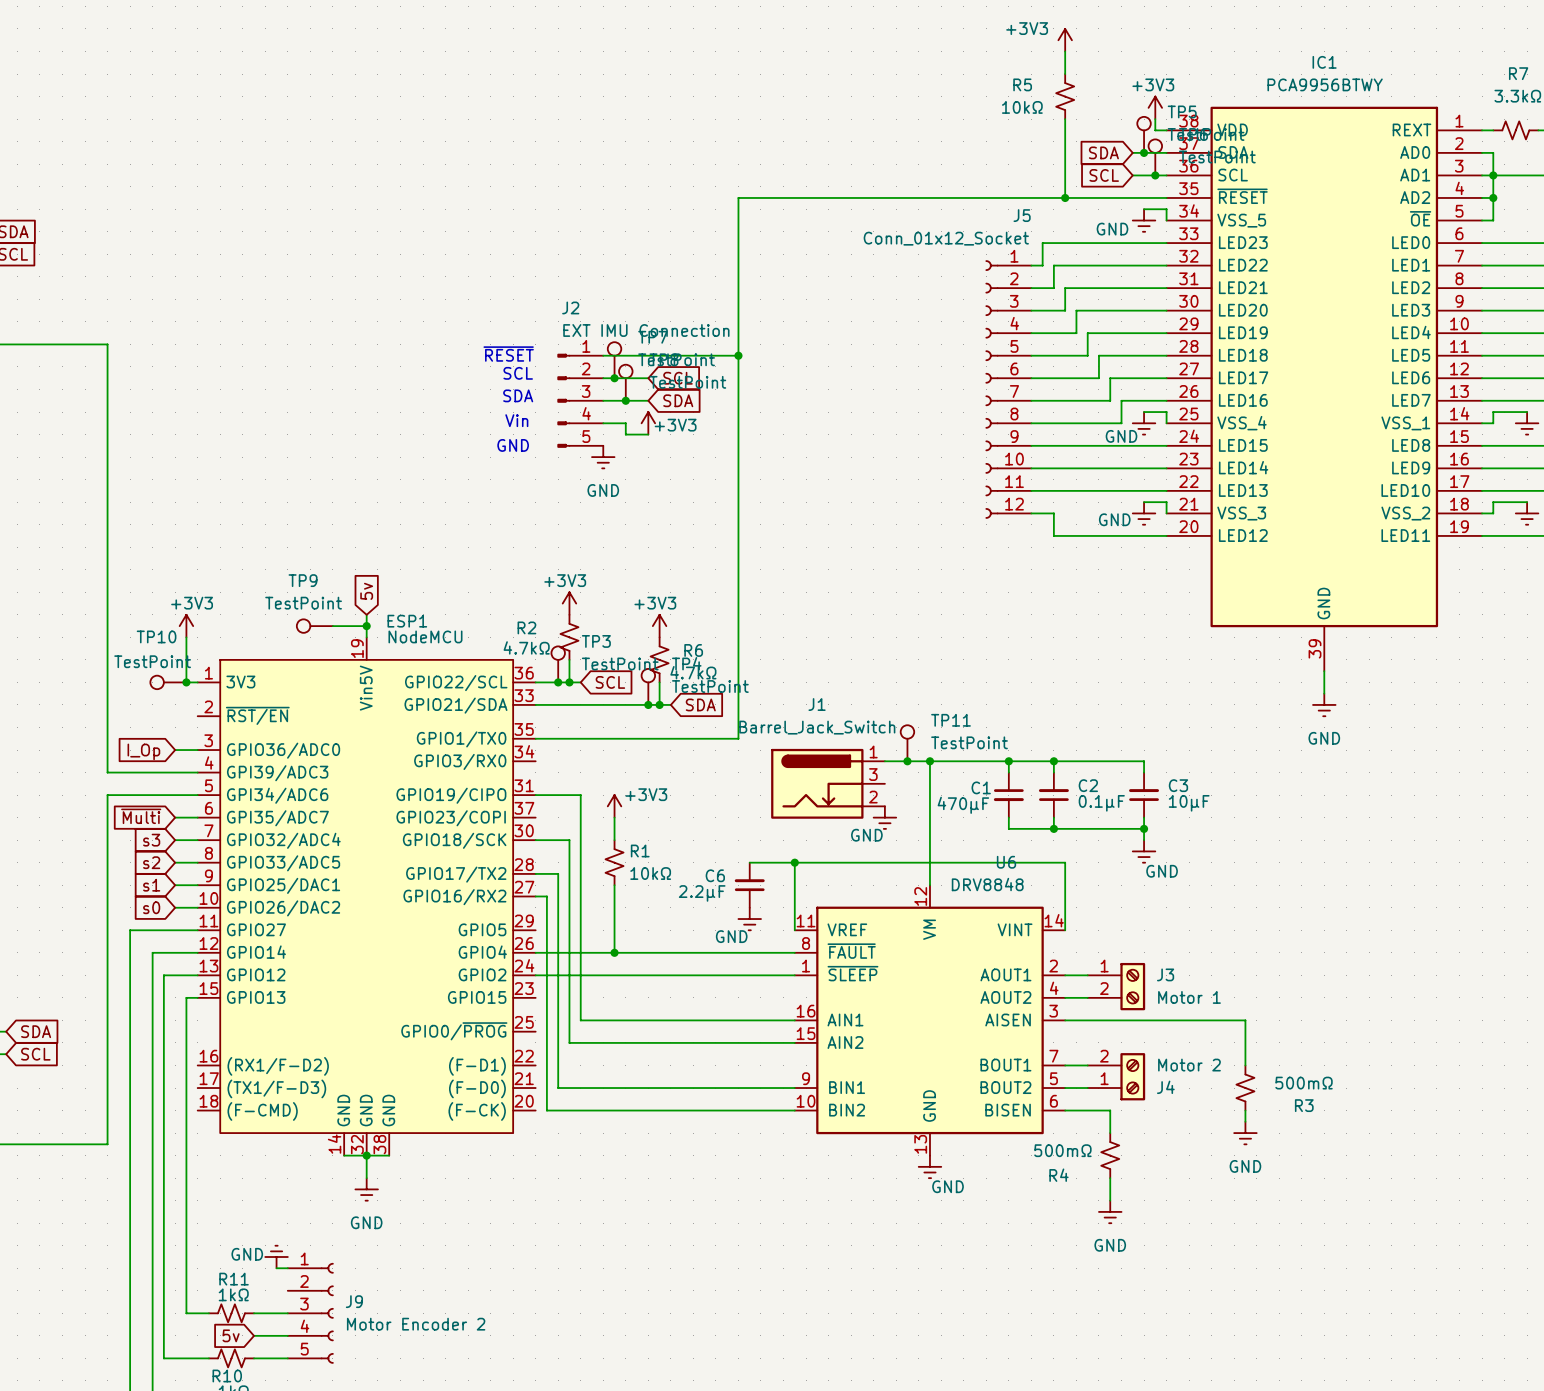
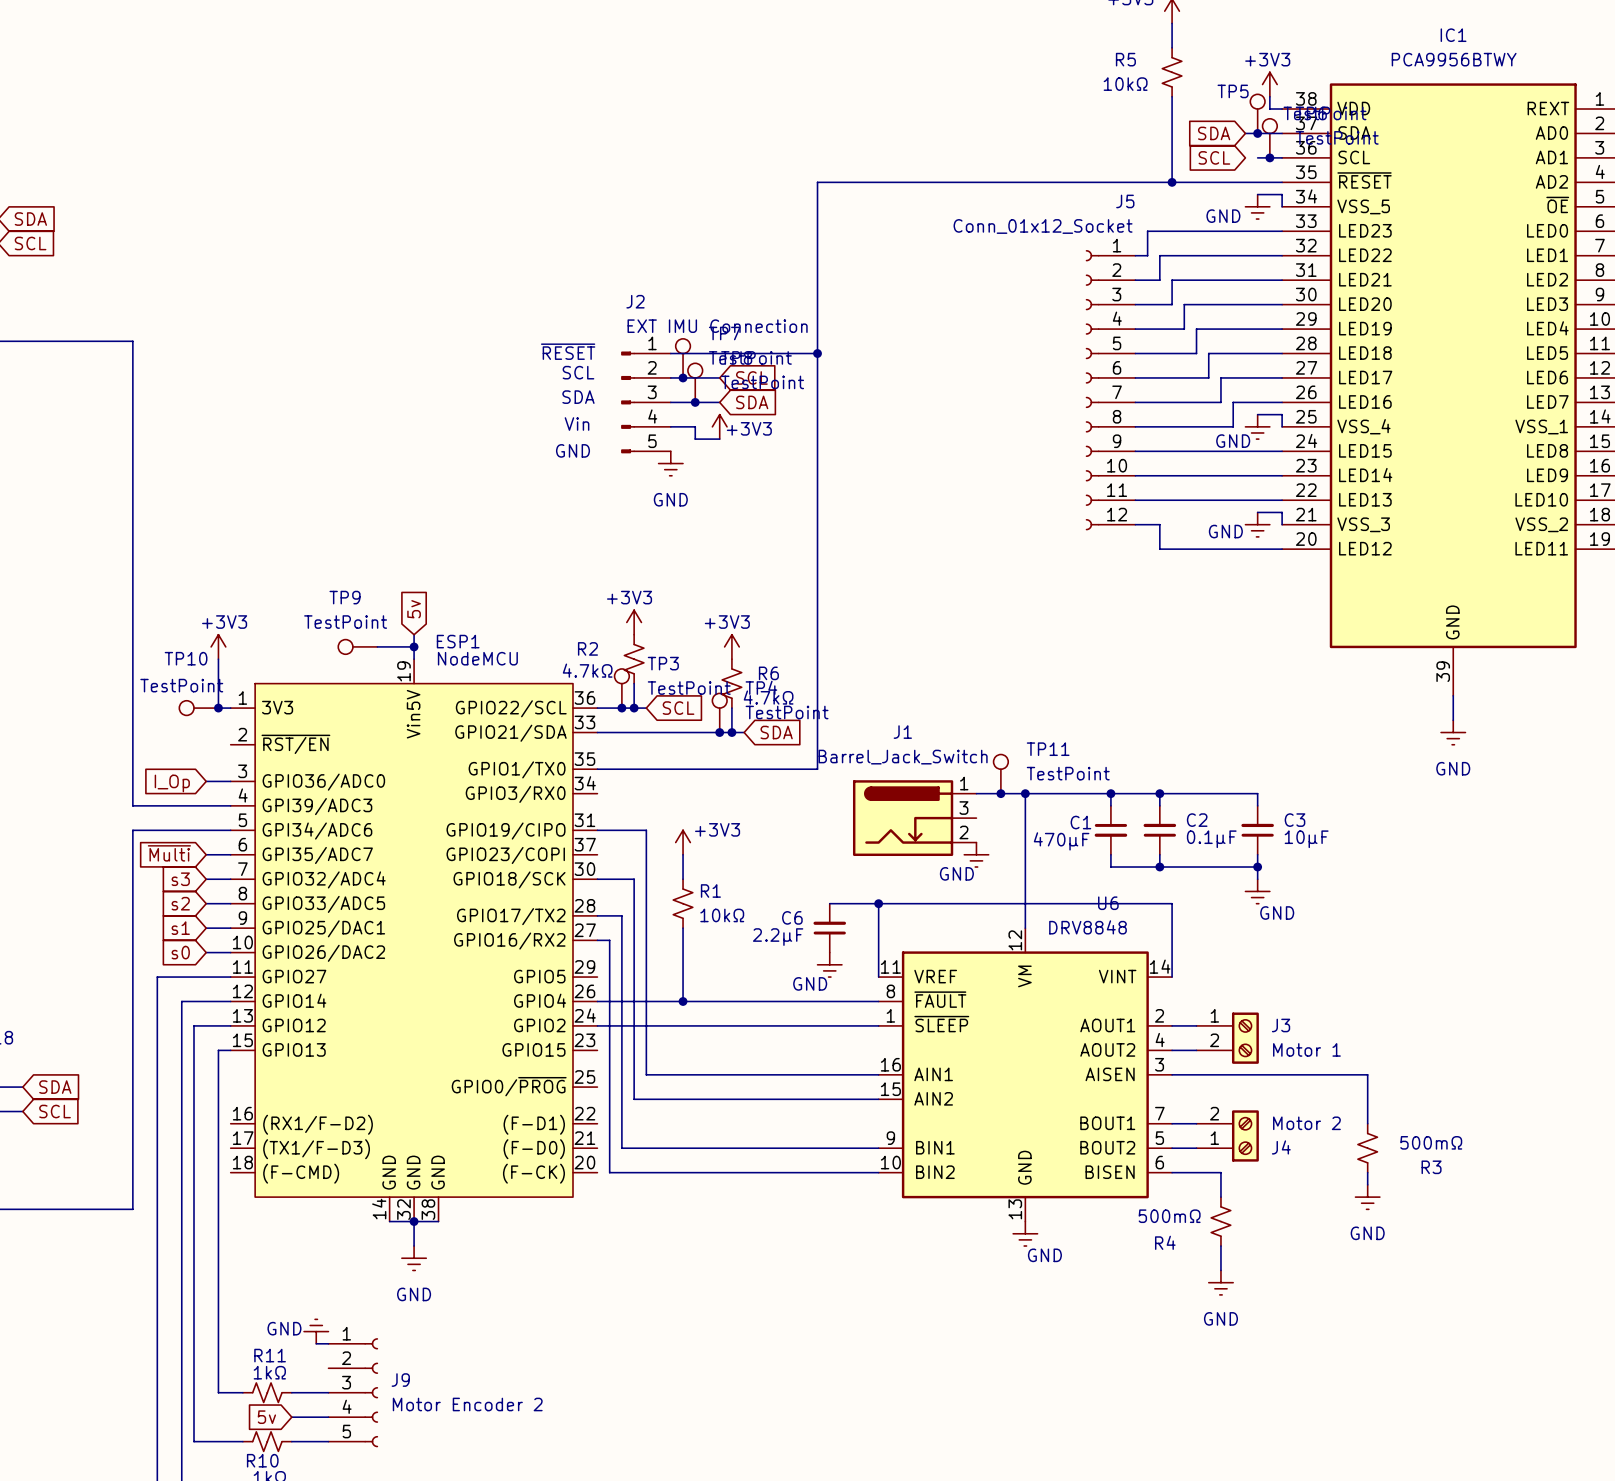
TP5 name position: TP5 (1182, 111) -> TP5 (1233, 91)
wire: (1132, 175) (1144, 175) -> none

